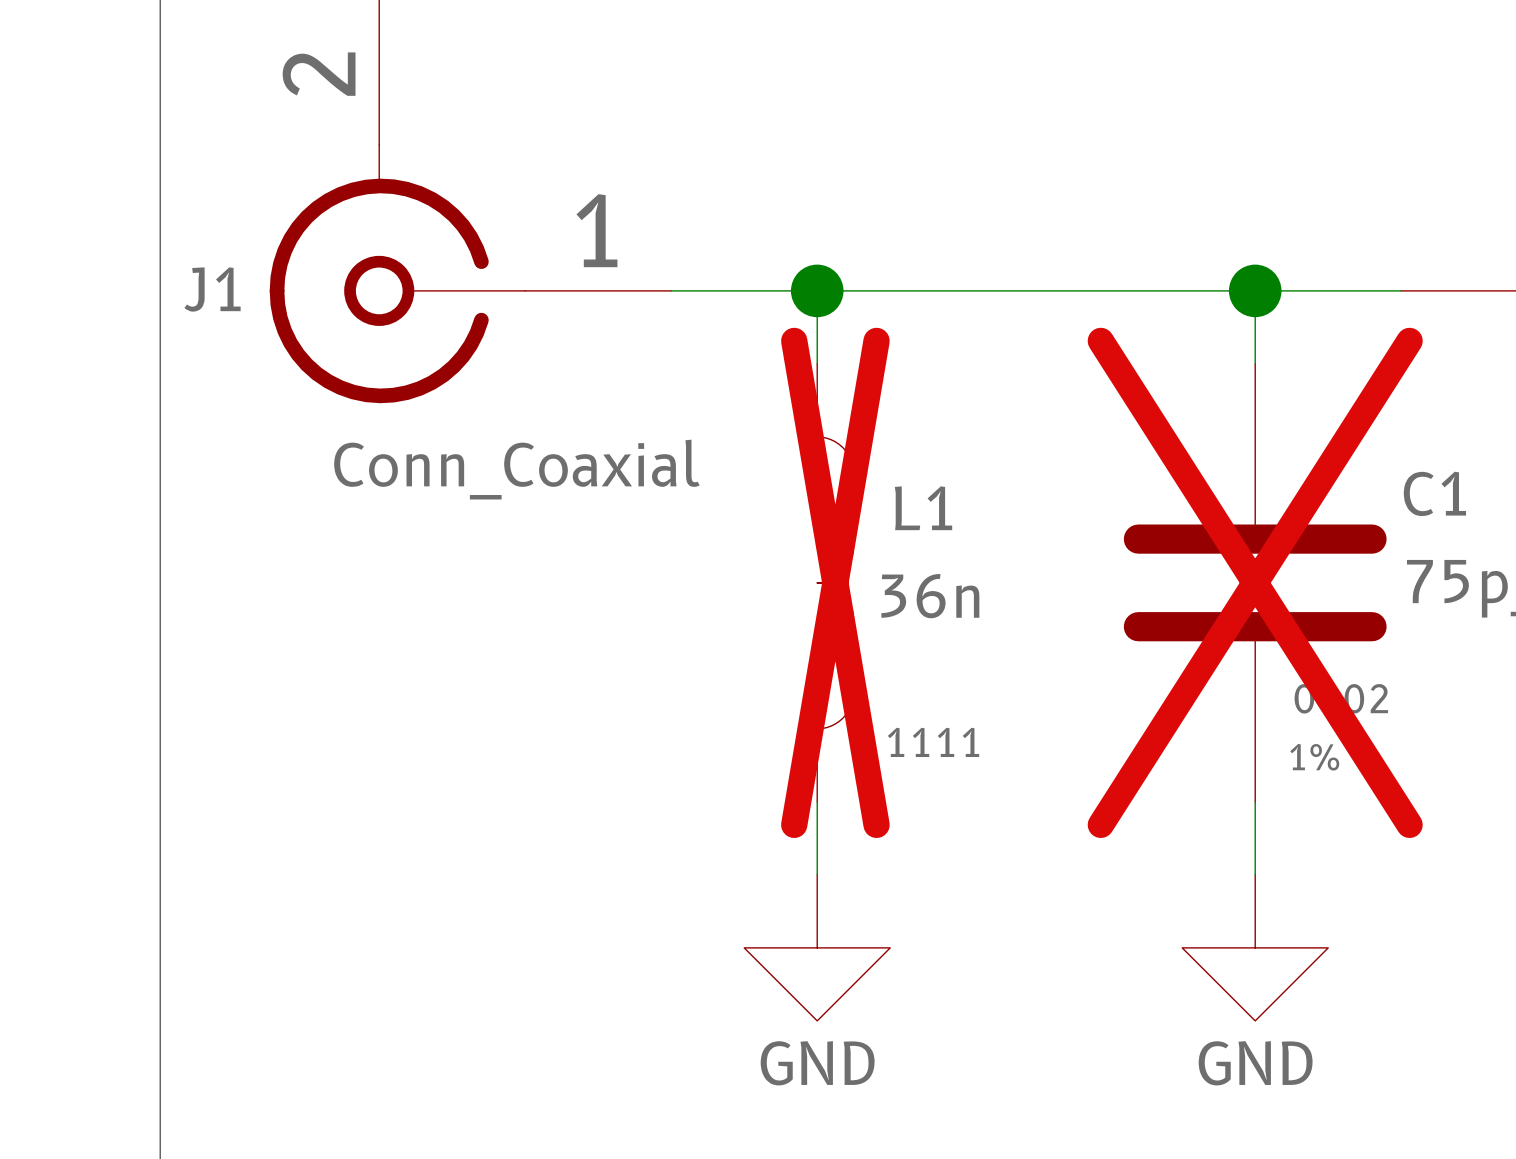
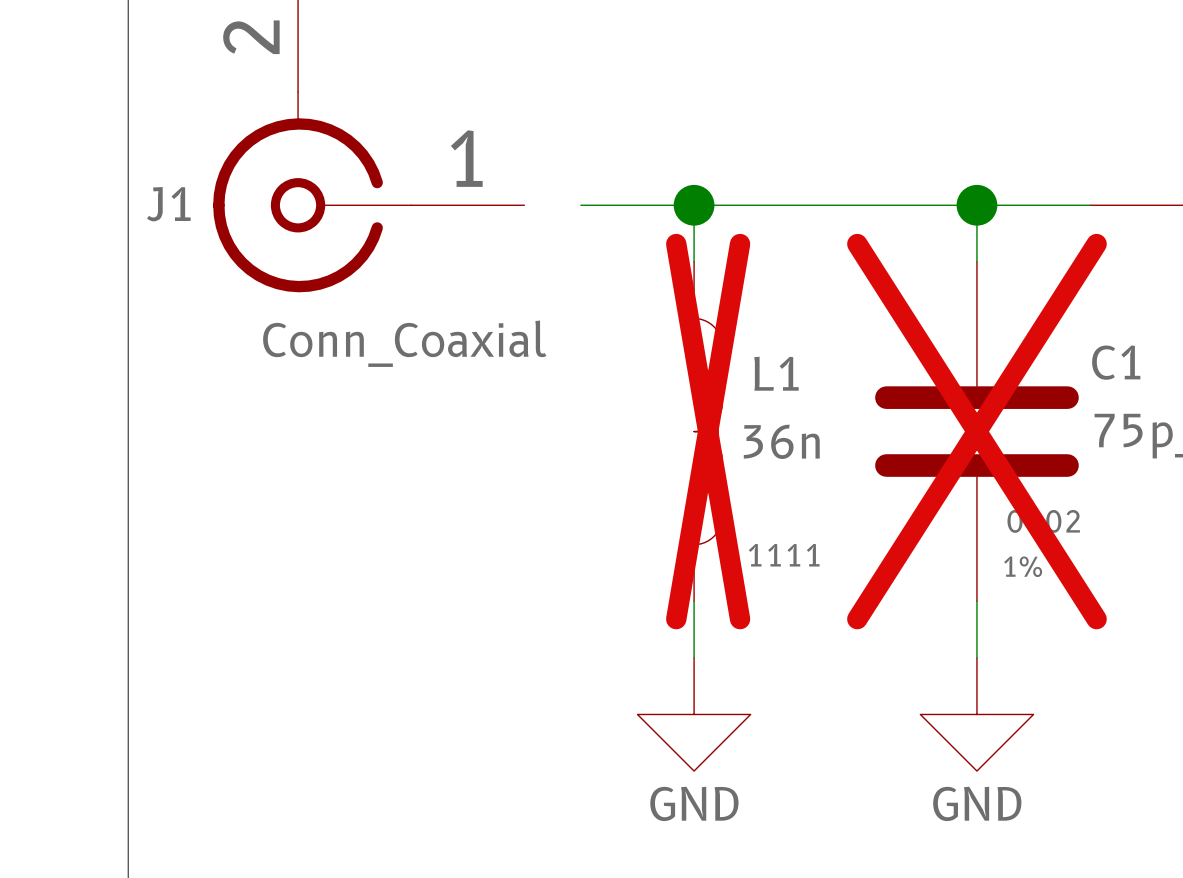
wire: (671, 290) (744, 290) -> none
wire: (817, 290) (817, 363) -> (694, 205) (694, 261)
junction position: (817, 290) -> (694, 205)
L1 position: (835, 582) -> (708, 431)
wire: (817, 801) (817, 874) -> (694, 601) (694, 657)
power symbol position: GND (817, 947) -> GND (694, 714)

